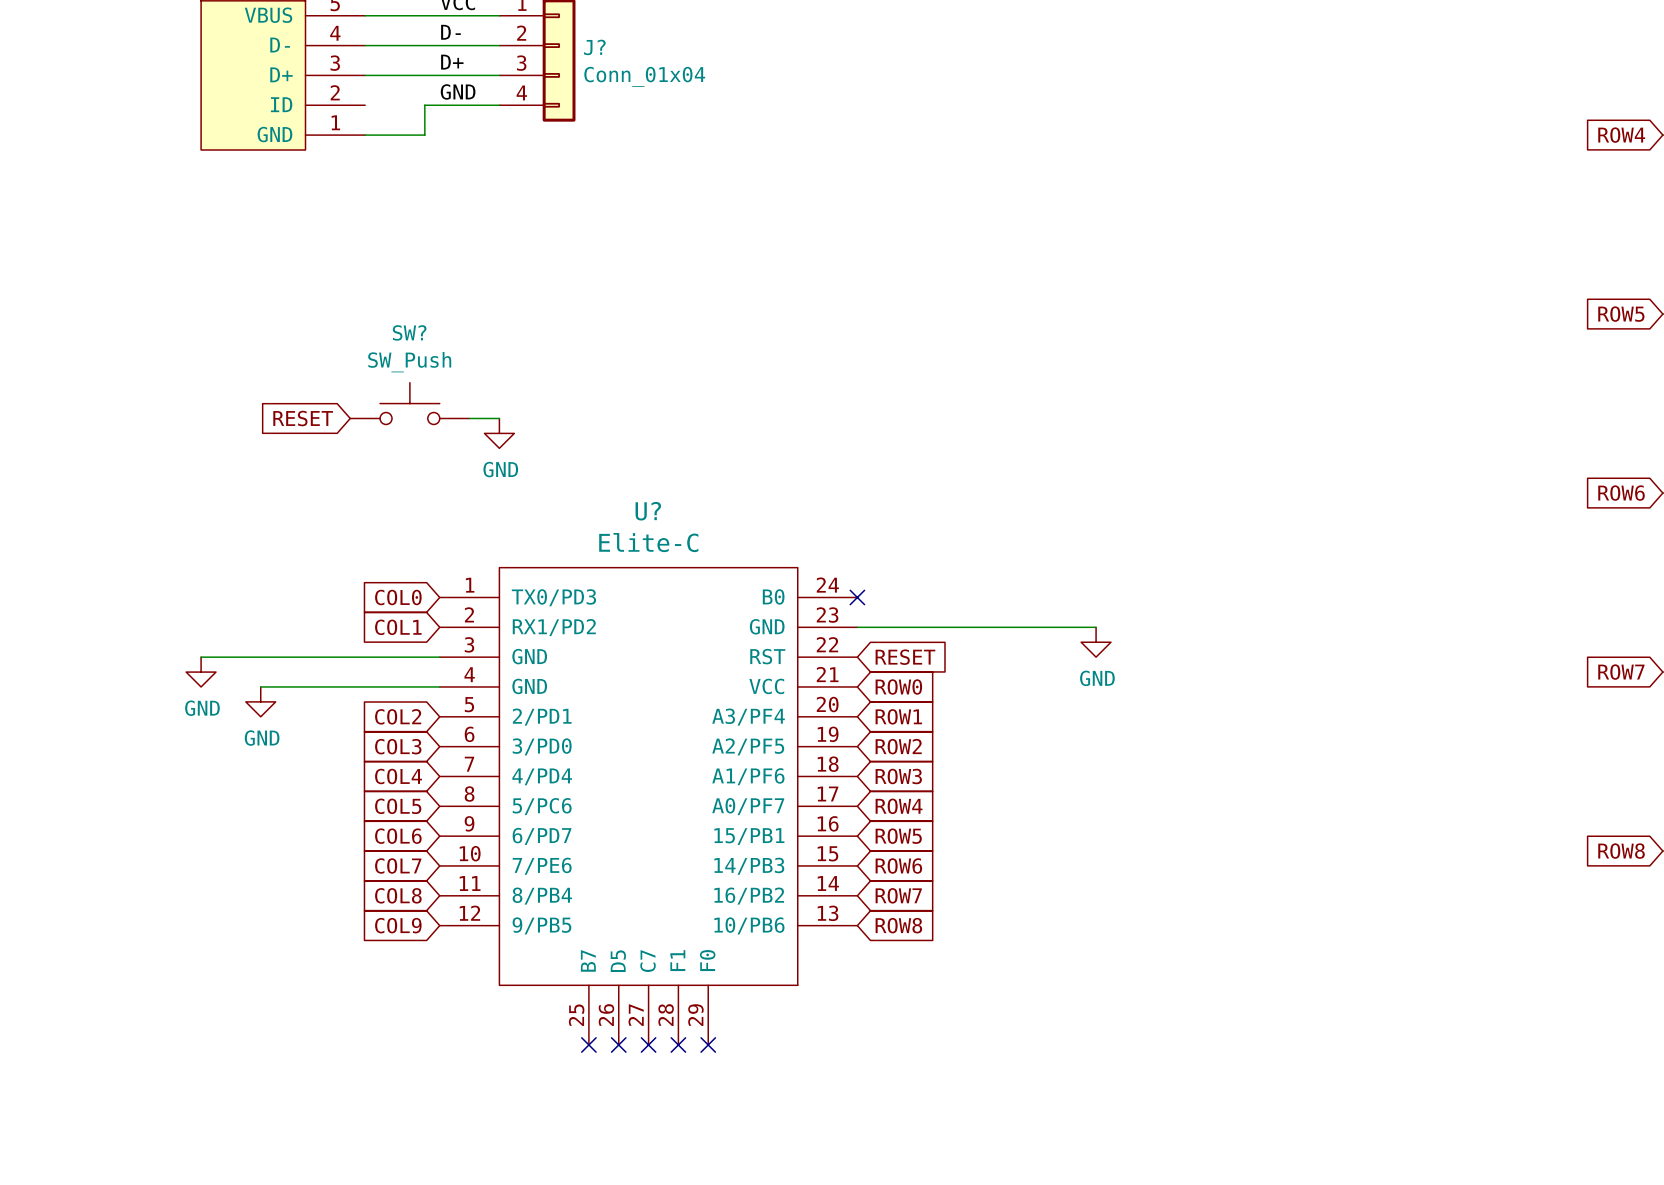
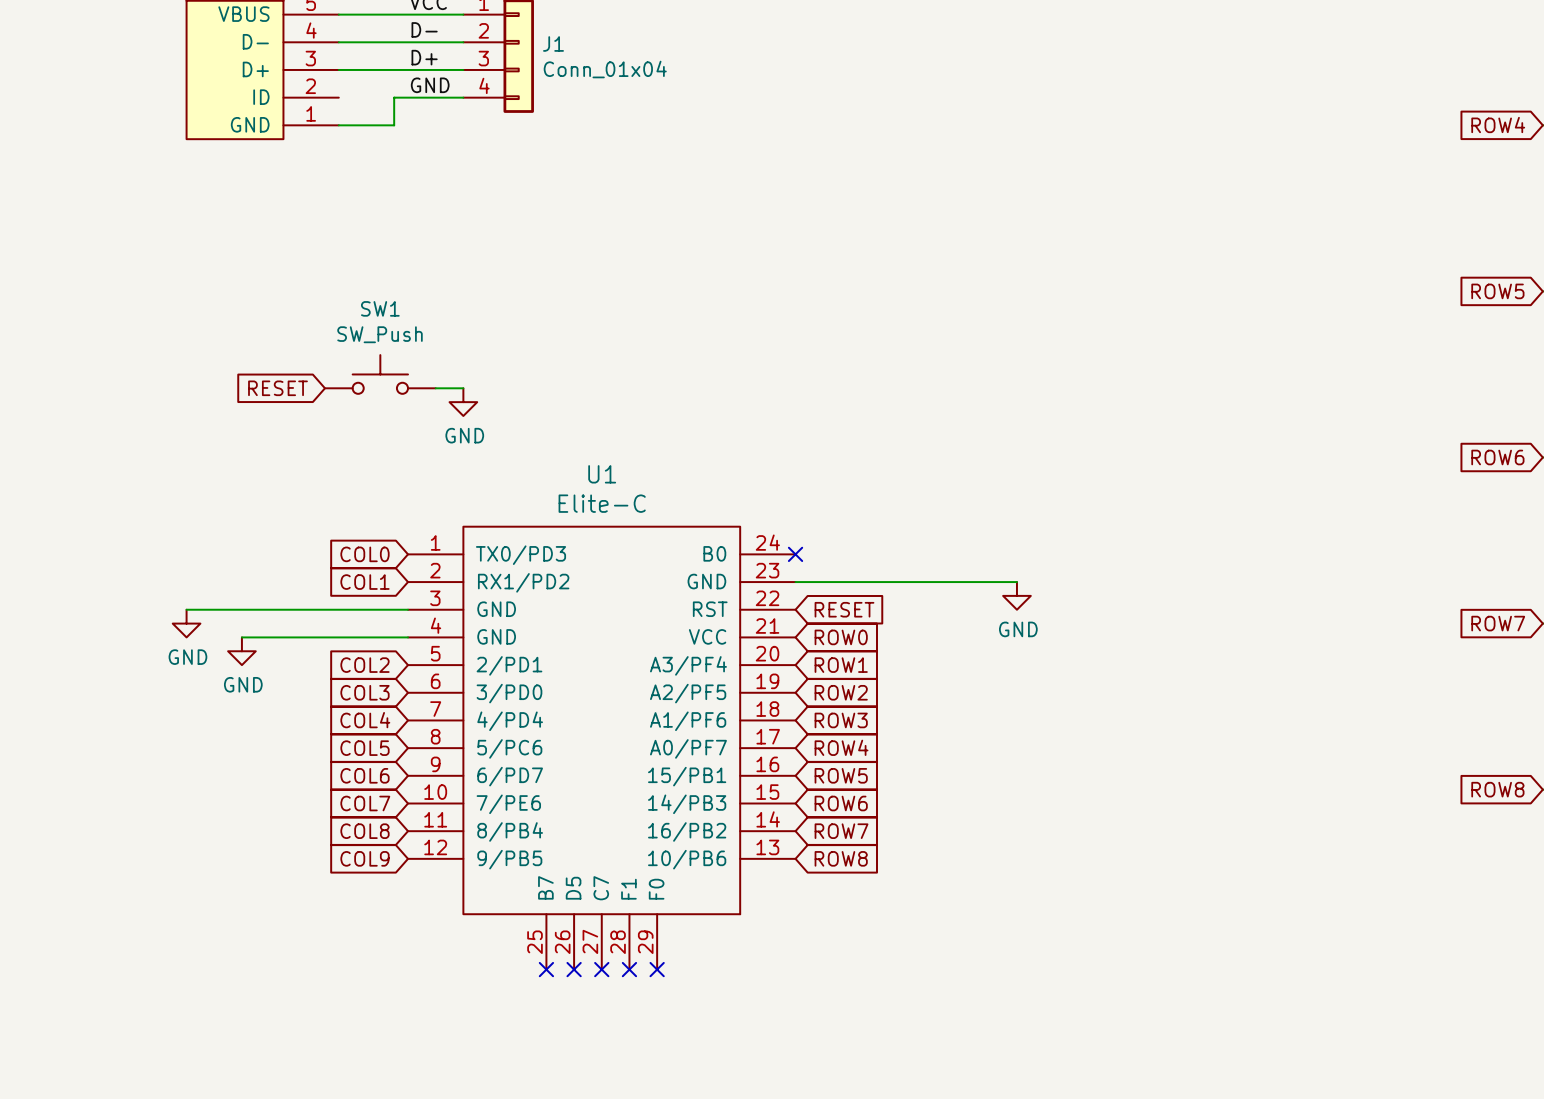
J? name: J? (594, 47) -> J1 (553, 43)
SW? name: SW? (409, 332) -> SW1 (380, 308)
U? name: U? (648, 511) -> U1 (602, 474)

